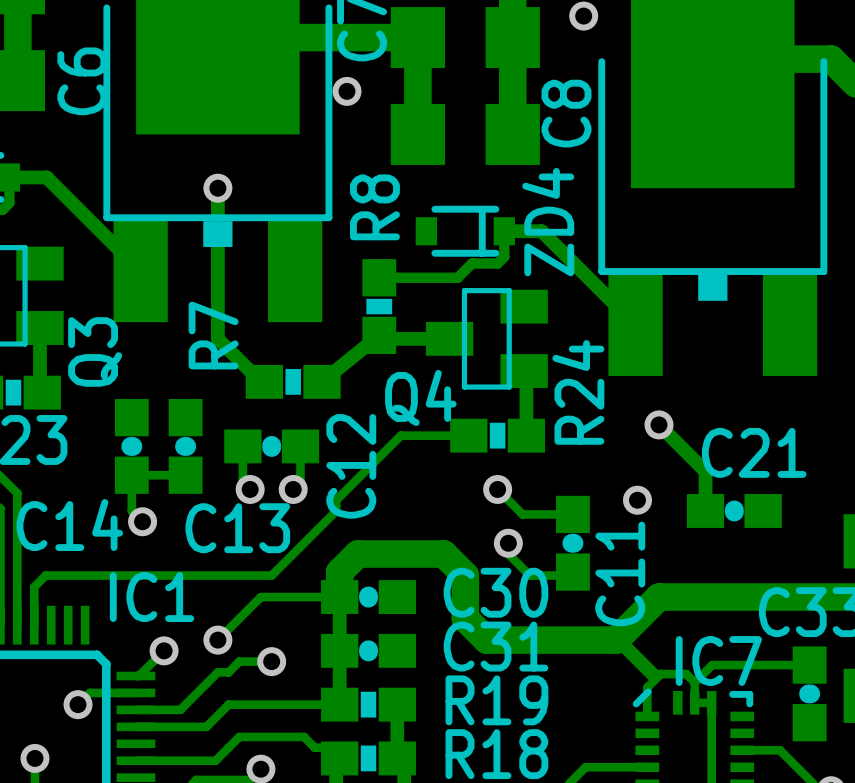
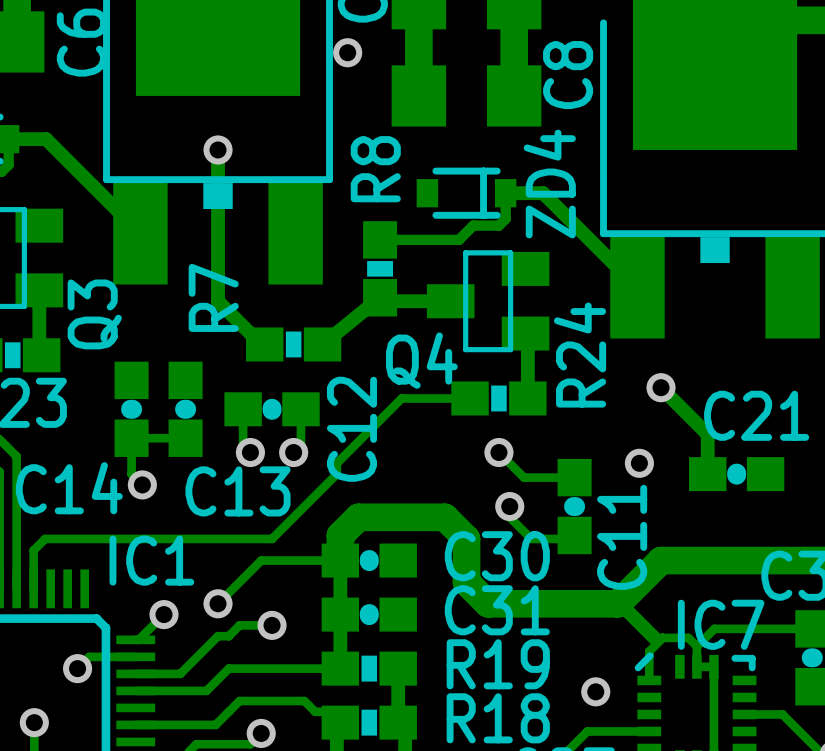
via: none -> (595, 691)

